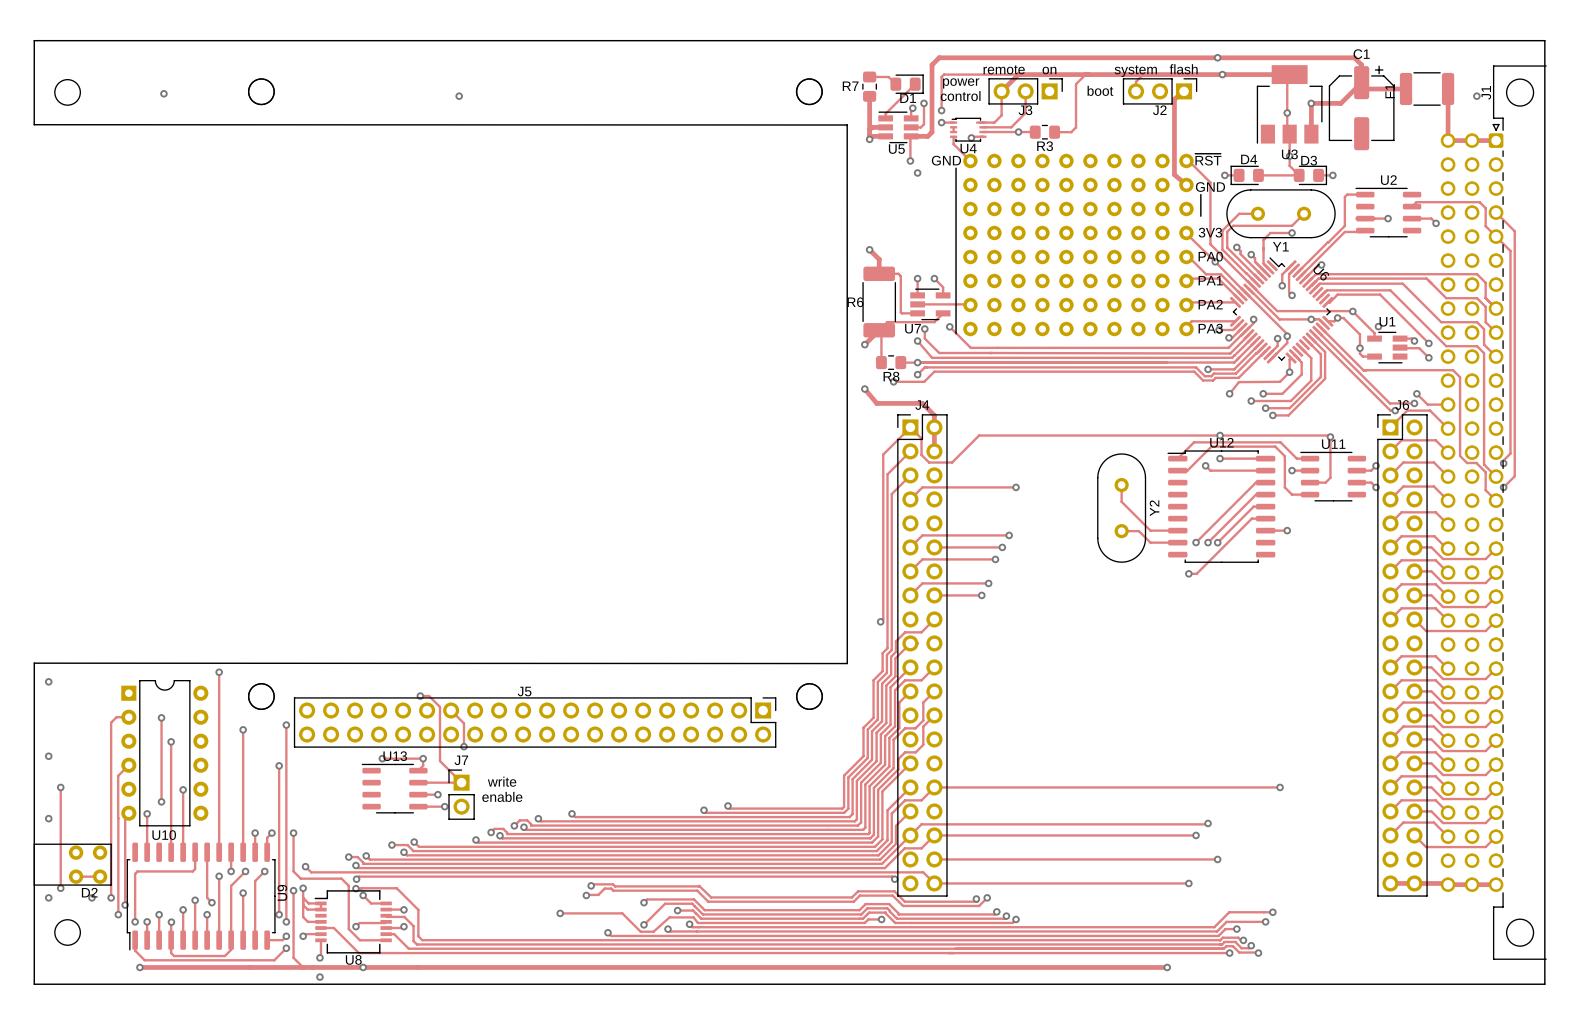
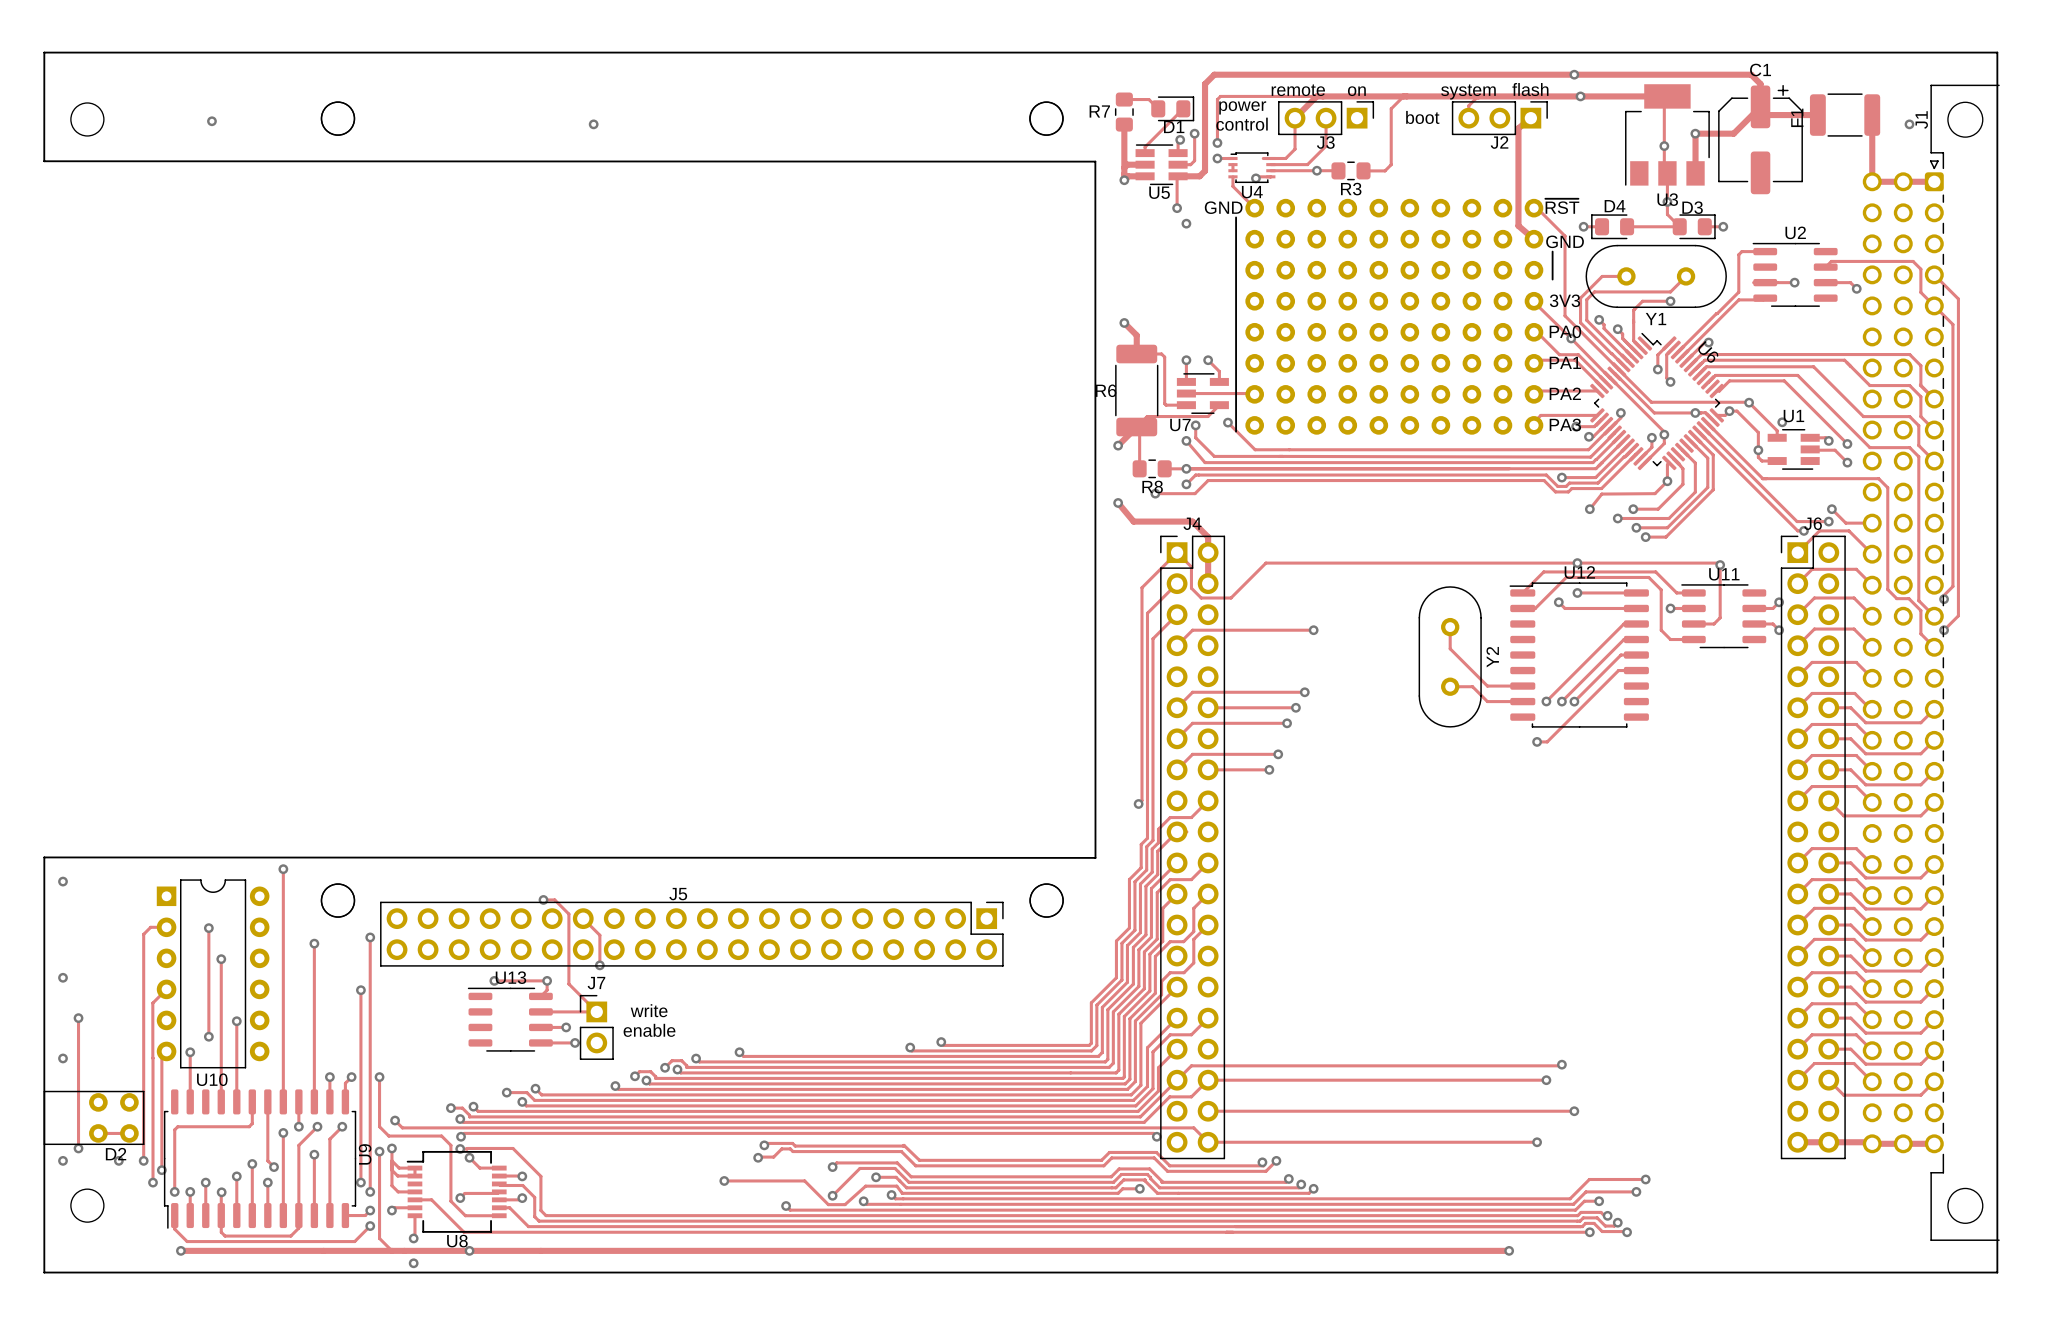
track: (1265, 530) (1287, 530) -> none
via: (1287, 530) -> none
track: (934, 787) (1280, 787) -> none
via: (1280, 787) -> none

